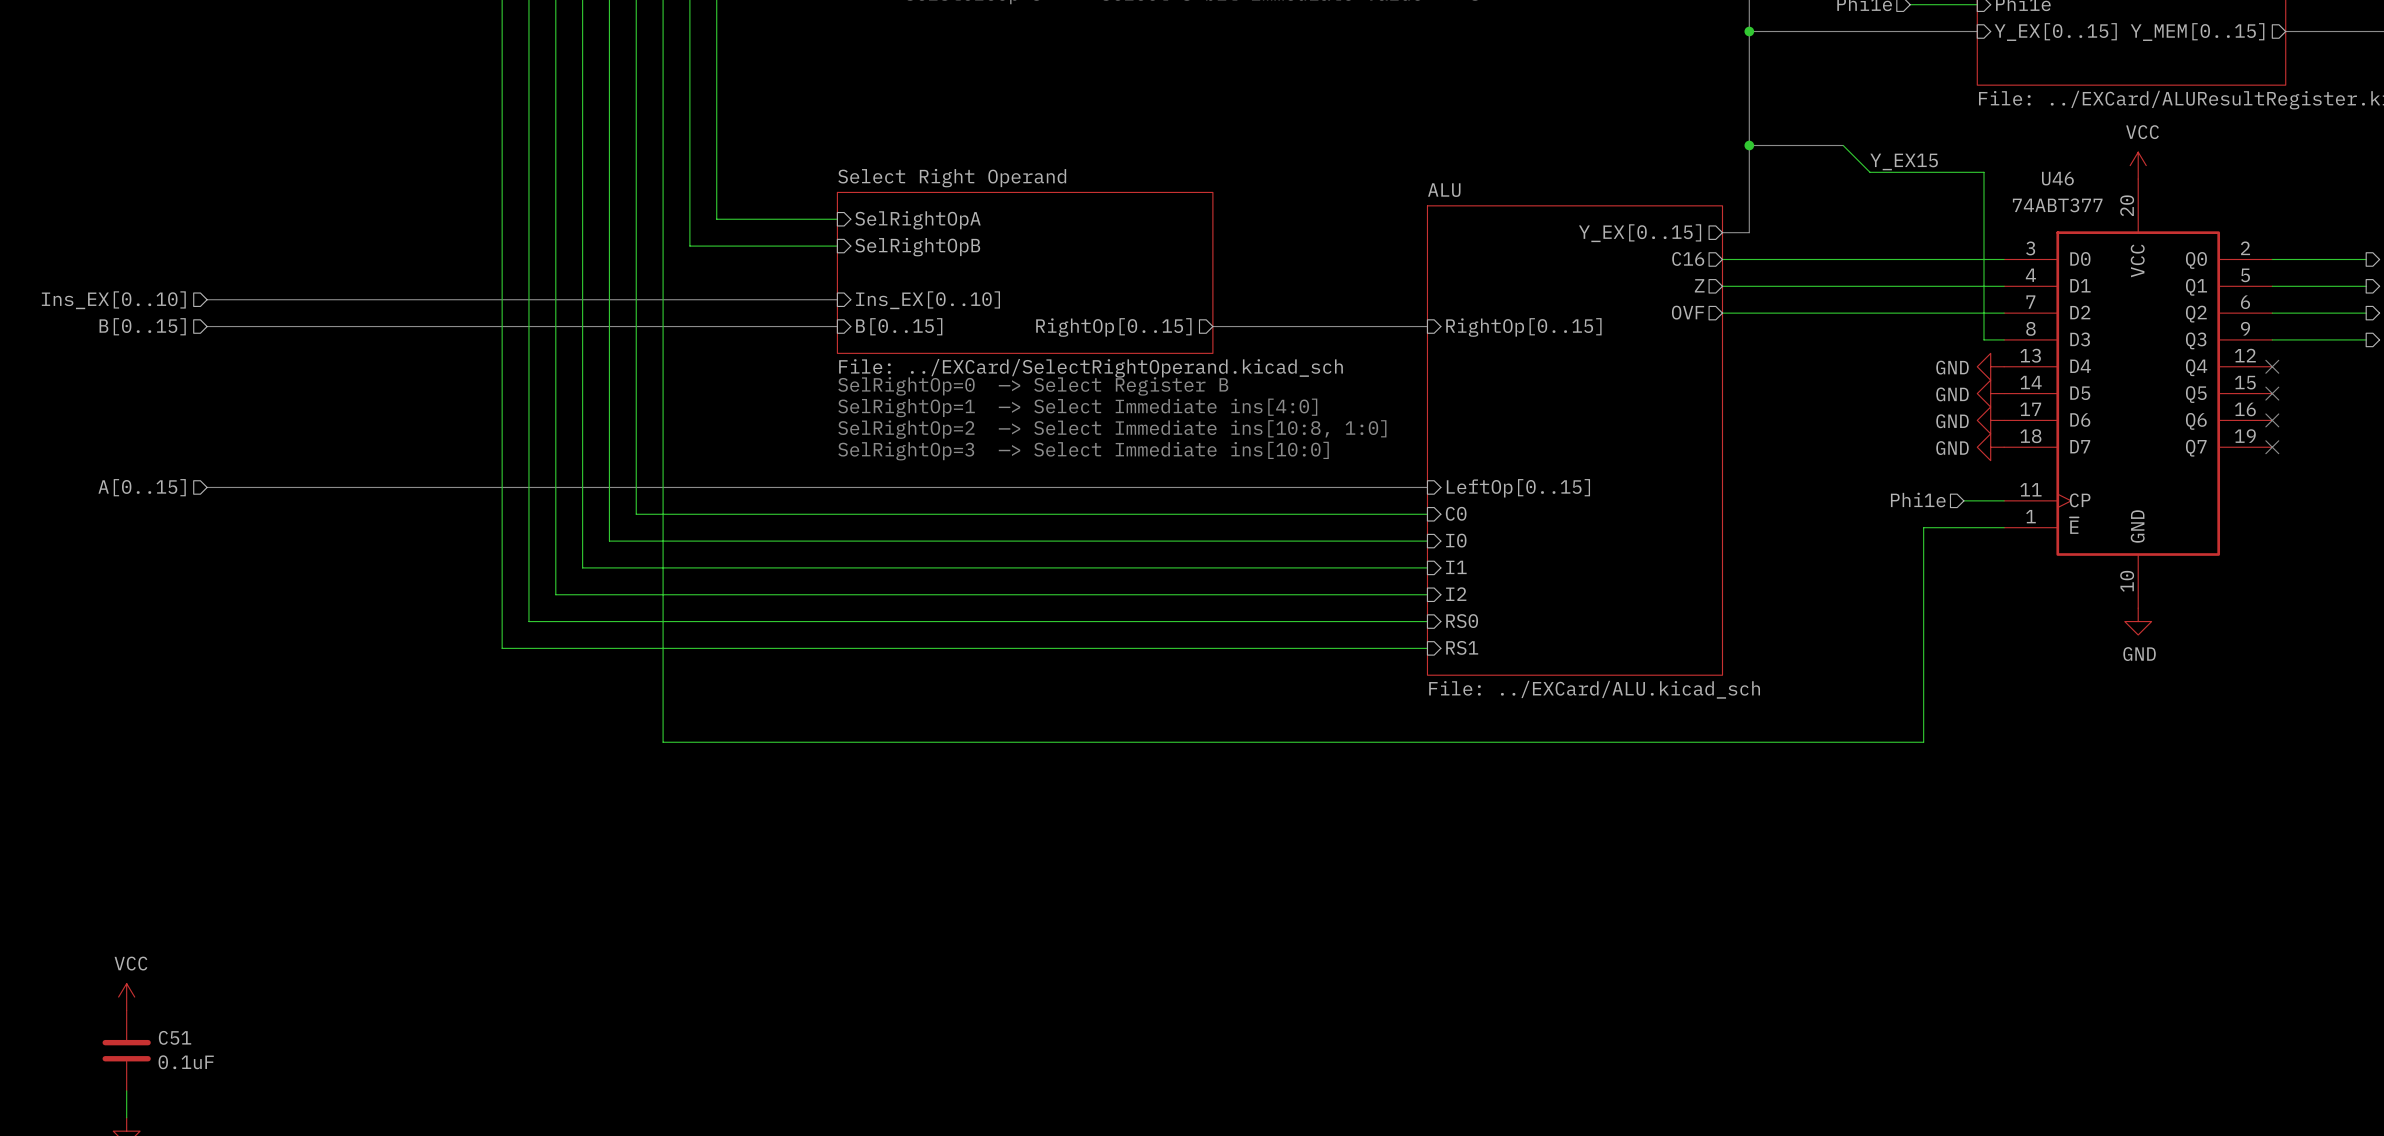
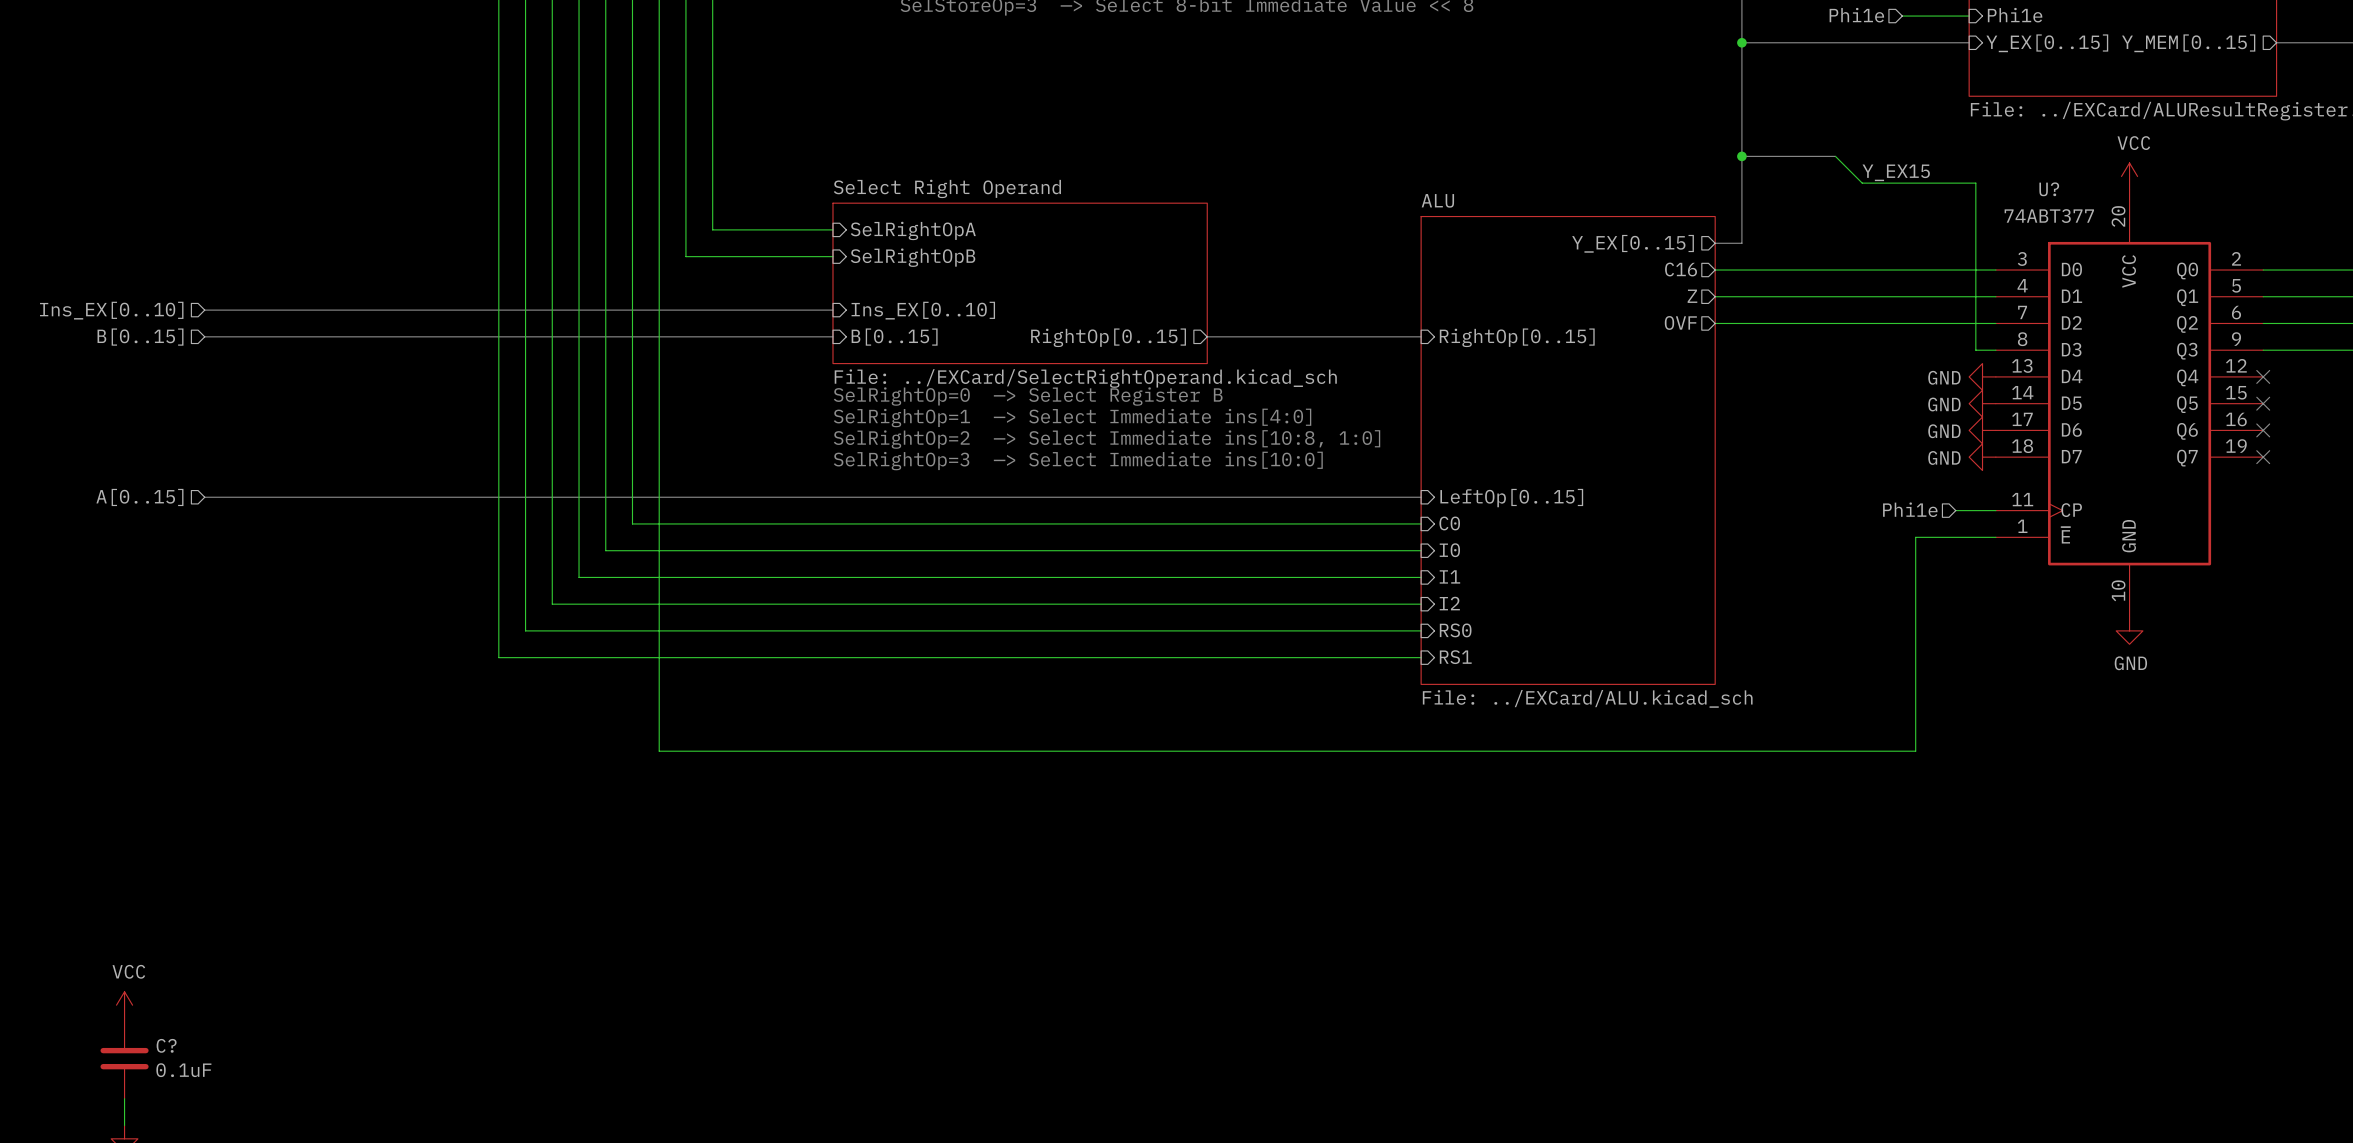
U46 name: U46 (2057, 178) -> U? (2049, 189)
C51 name: C51 (175, 1037) -> C? (166, 1045)

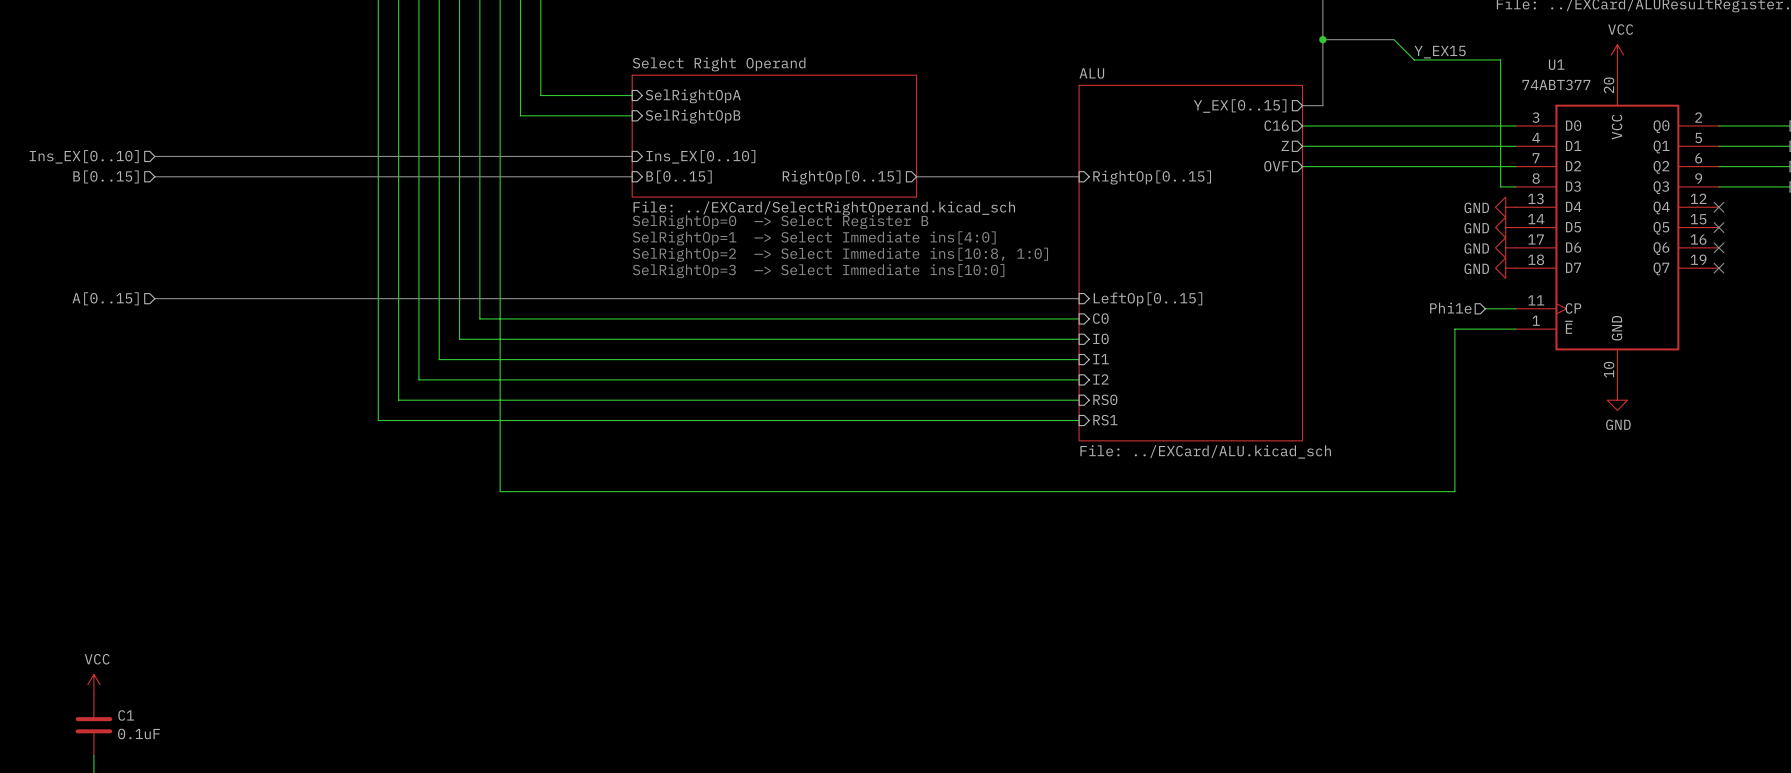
U? name: U? (2049, 189) -> U1 (1556, 64)
C? name: C? (166, 1045) -> C1 (126, 715)

